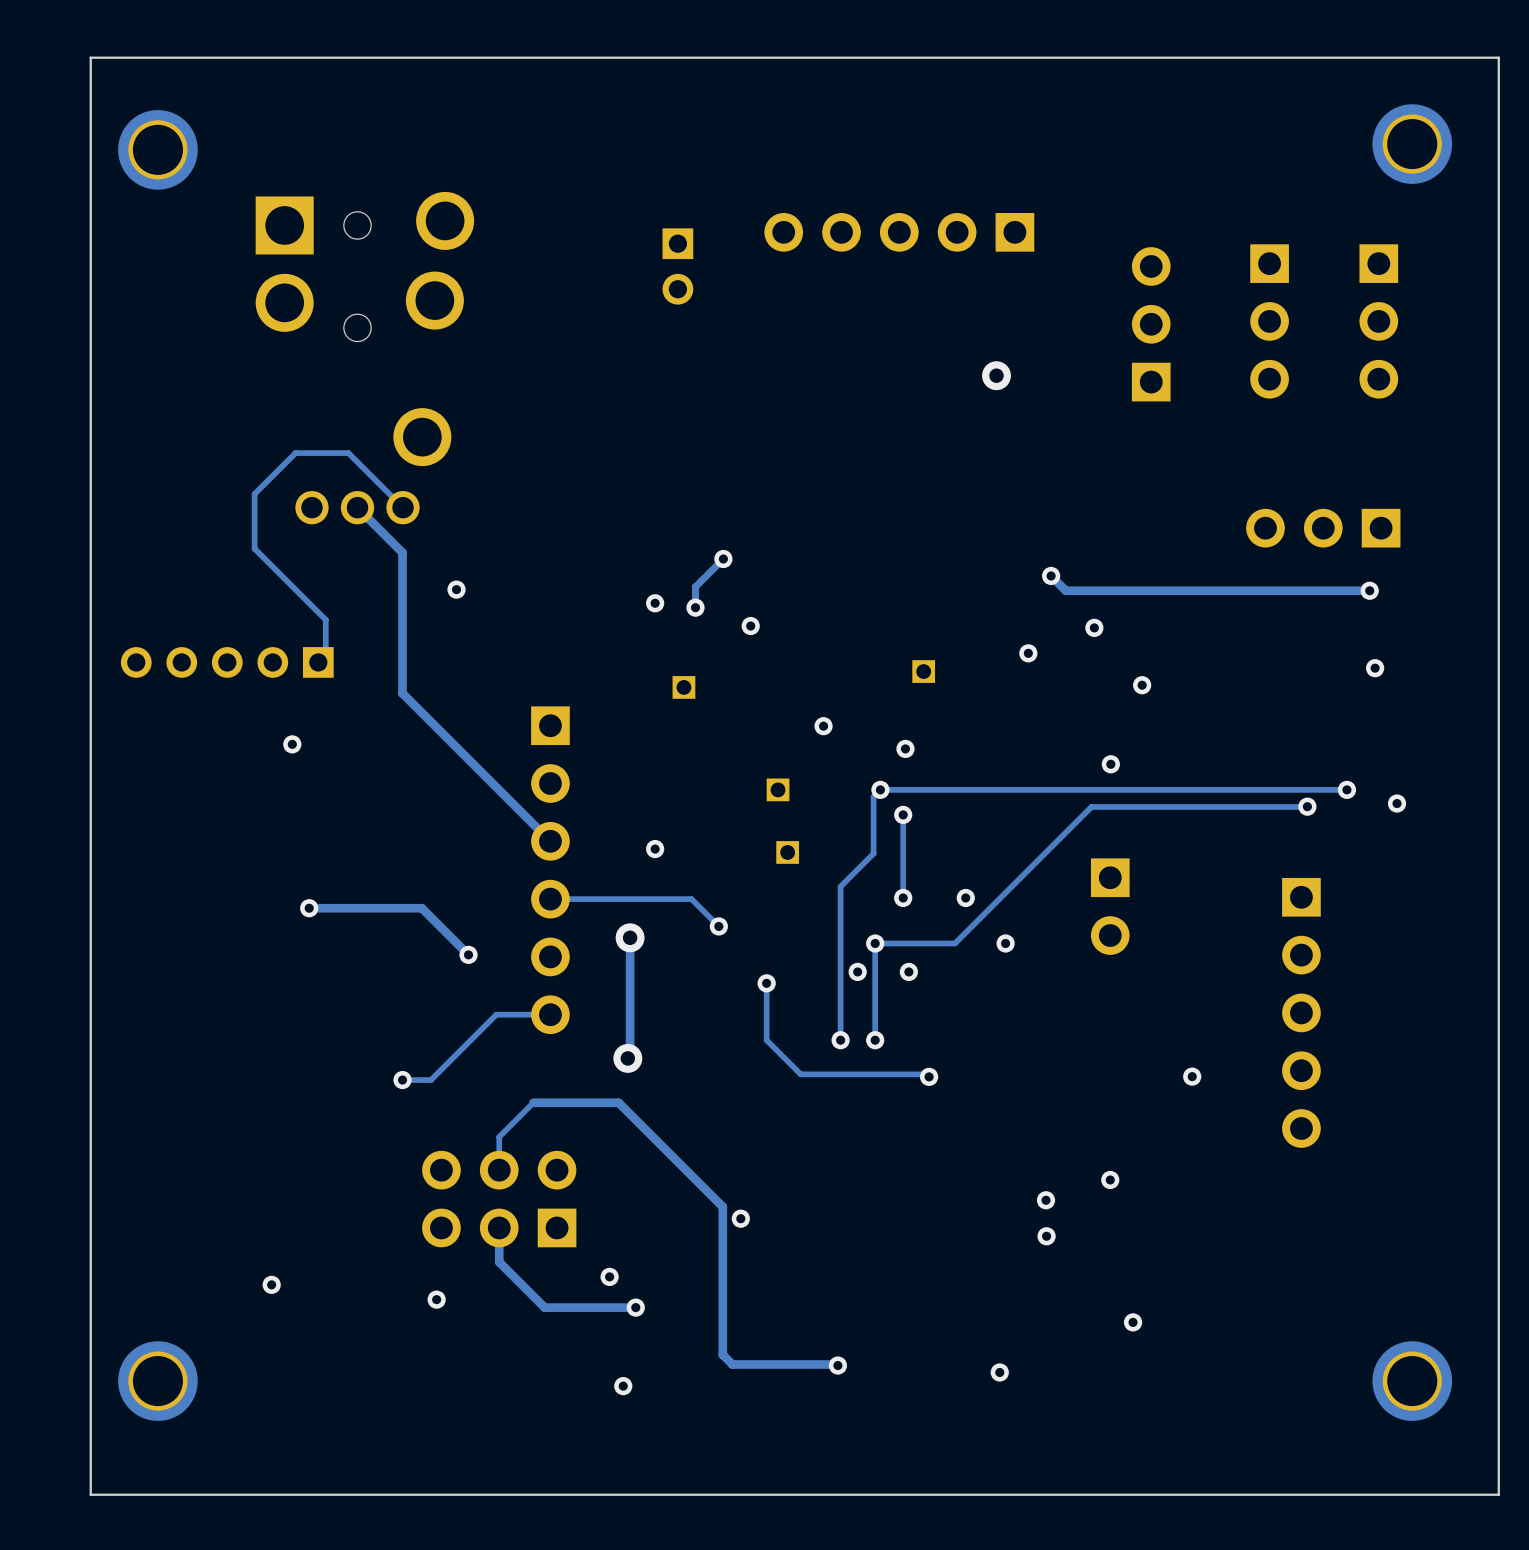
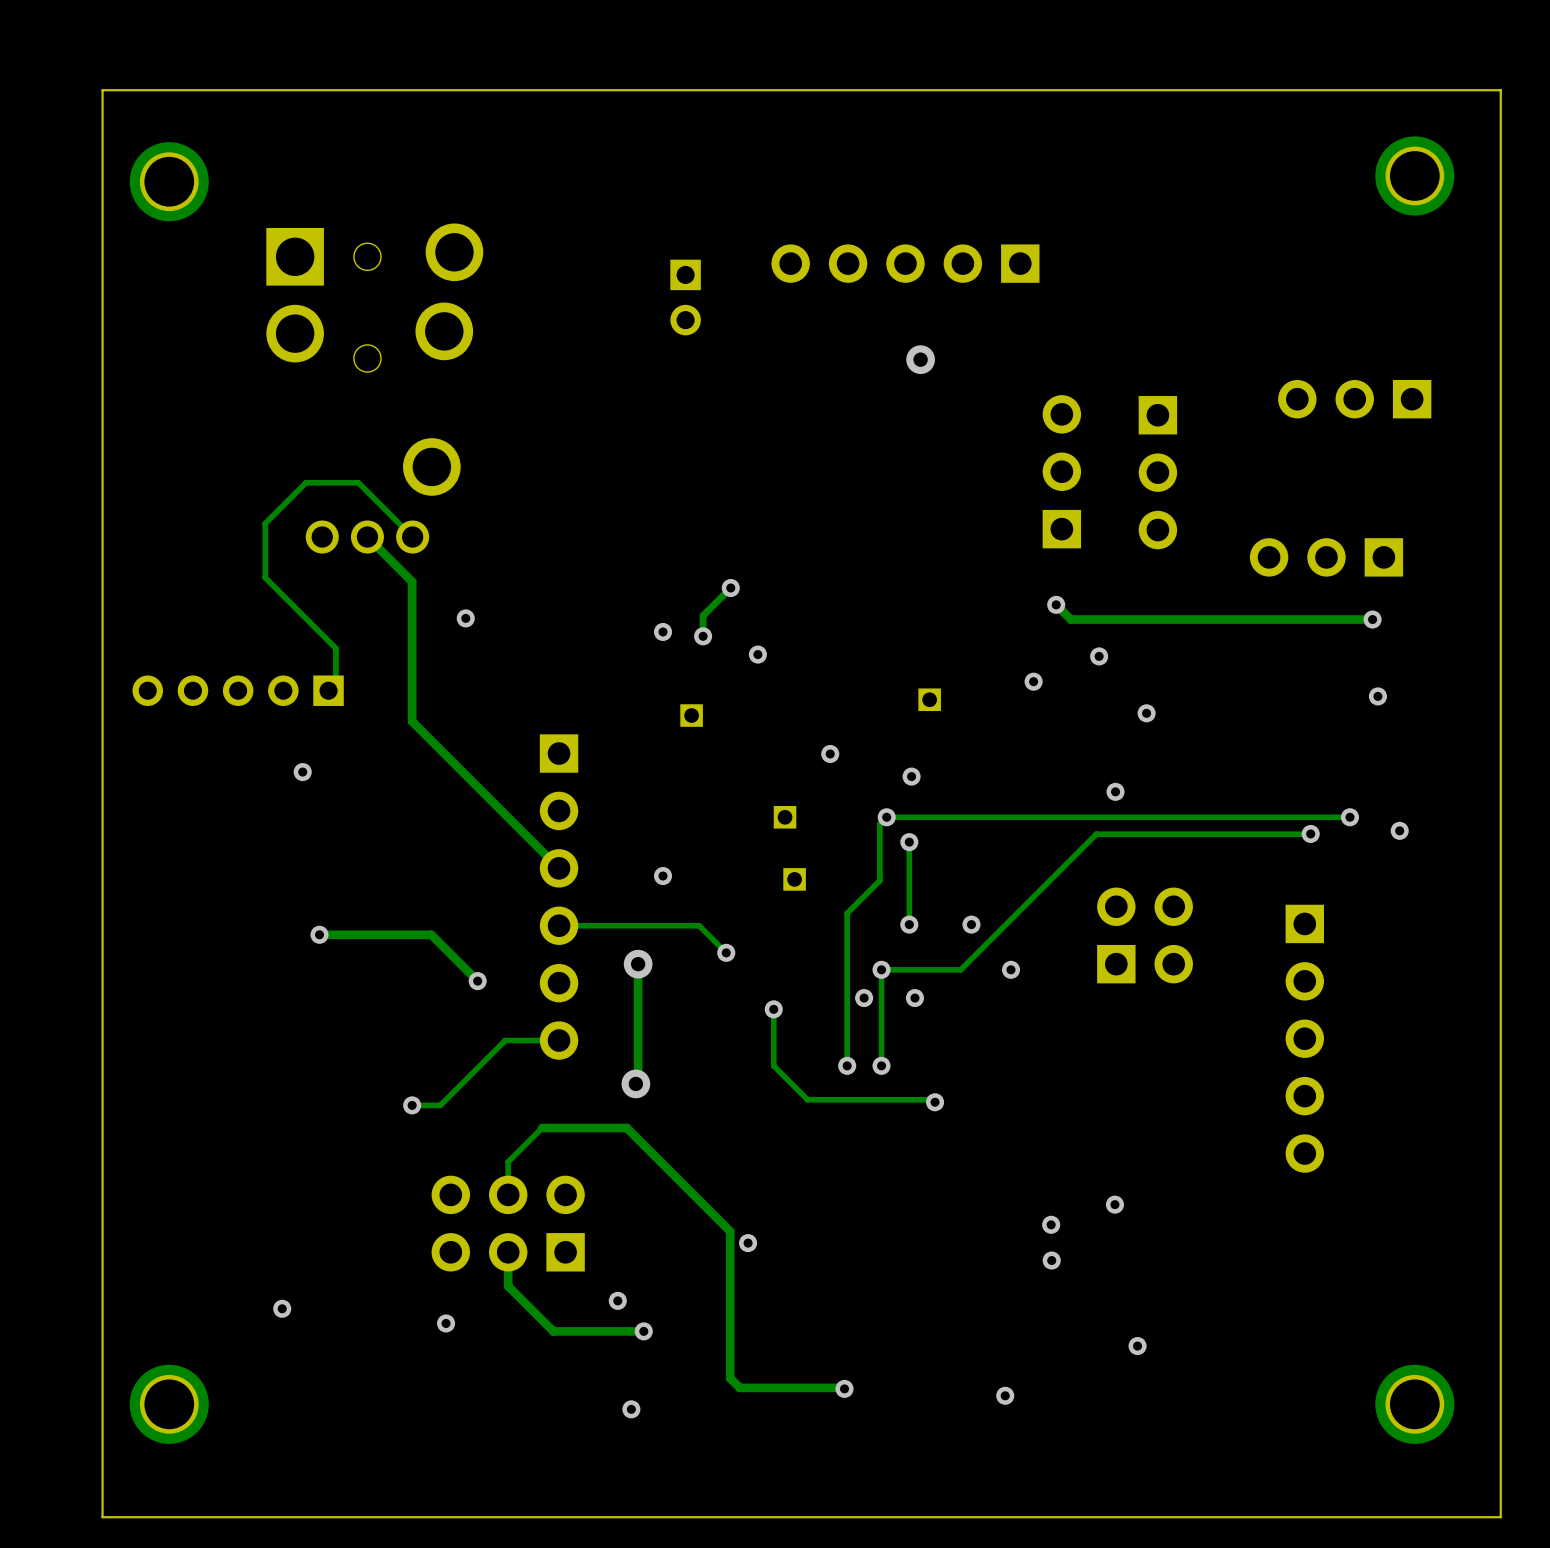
part: (1269, 321) -> none
part: (1378, 321) -> none
part: (1151, 324) -> none
part: none -> (1354, 399)
via position: (996, 375) -> (920, 359)
part: none -> (1061, 471)
part: none -> (1157, 472)
part: (1110, 906) -> none
part: none -> (1145, 935)
via: (1192, 1076) -> none

